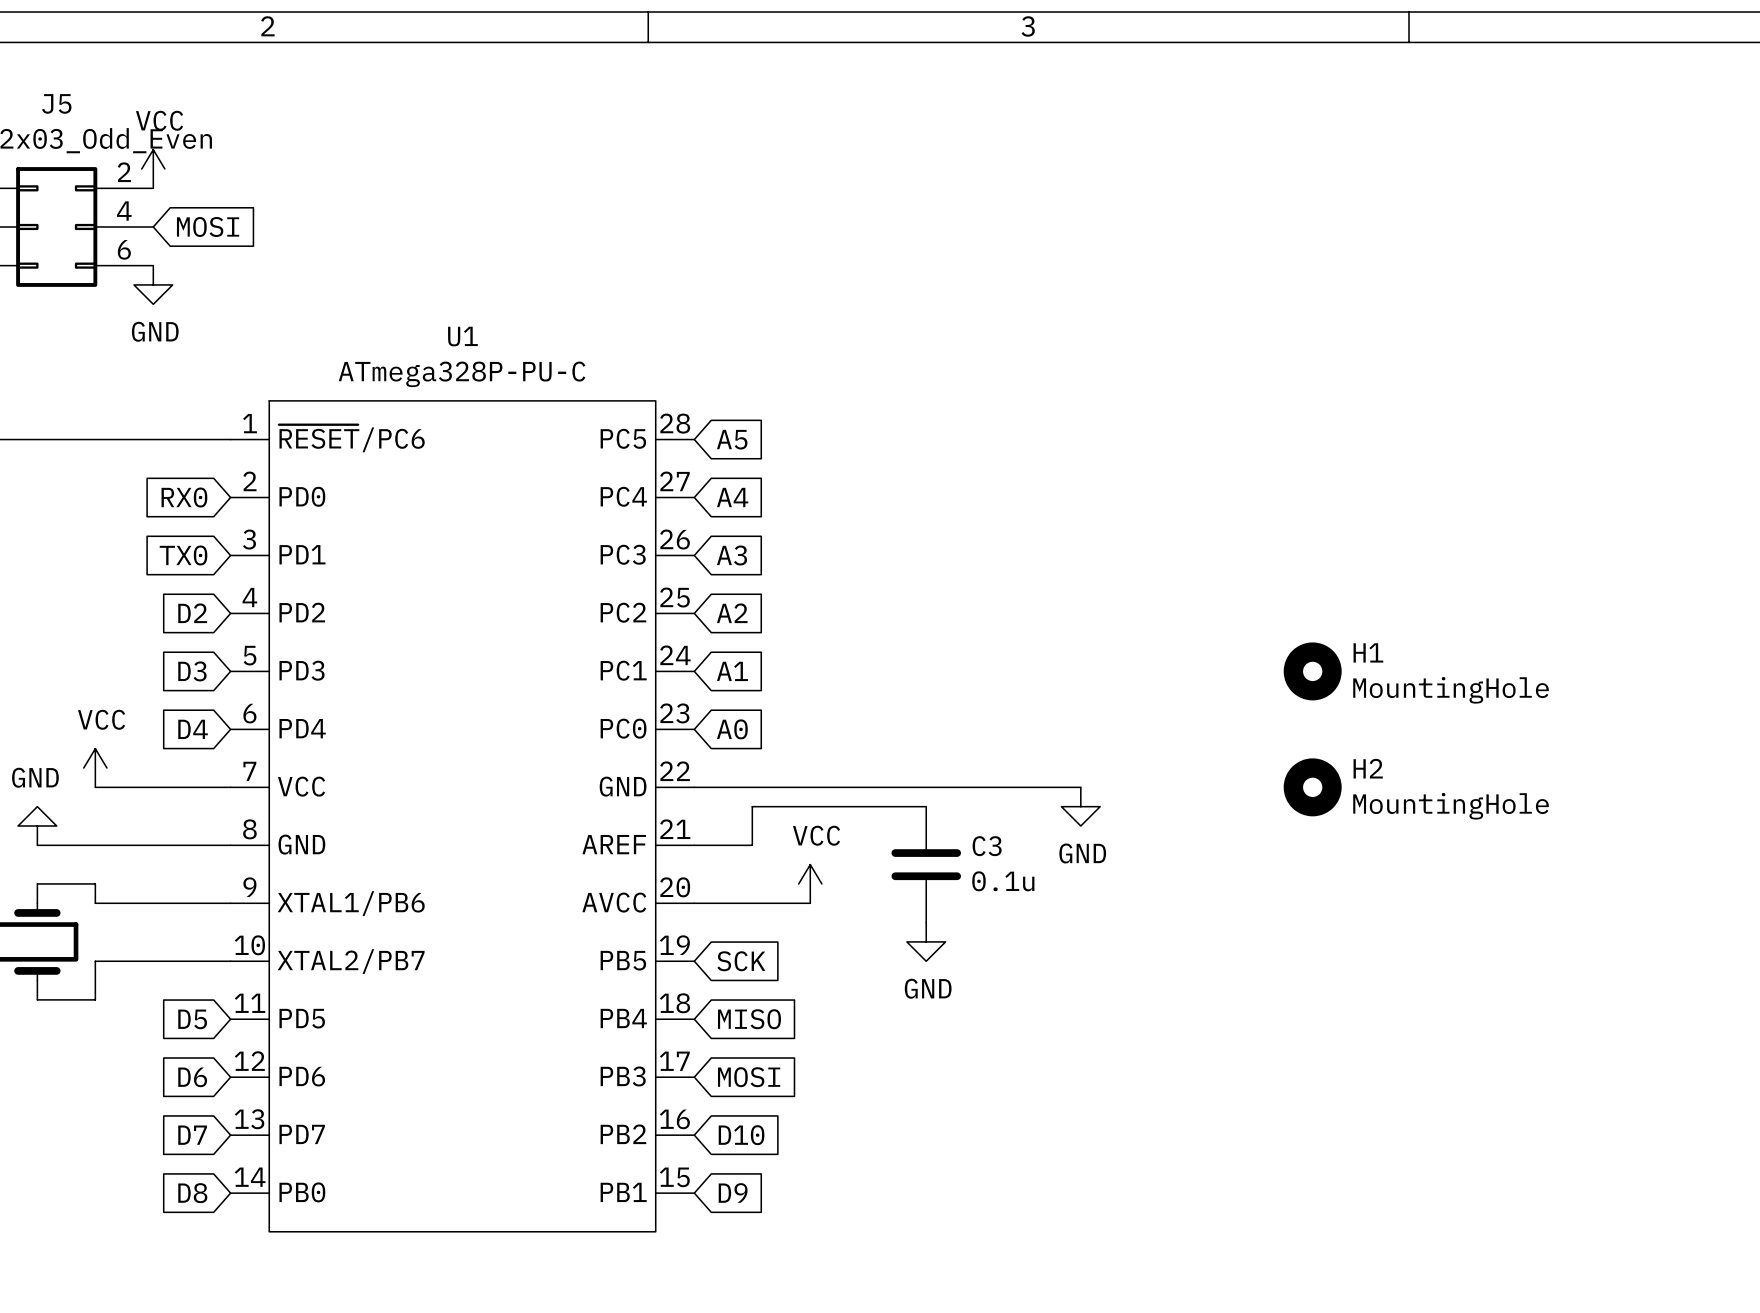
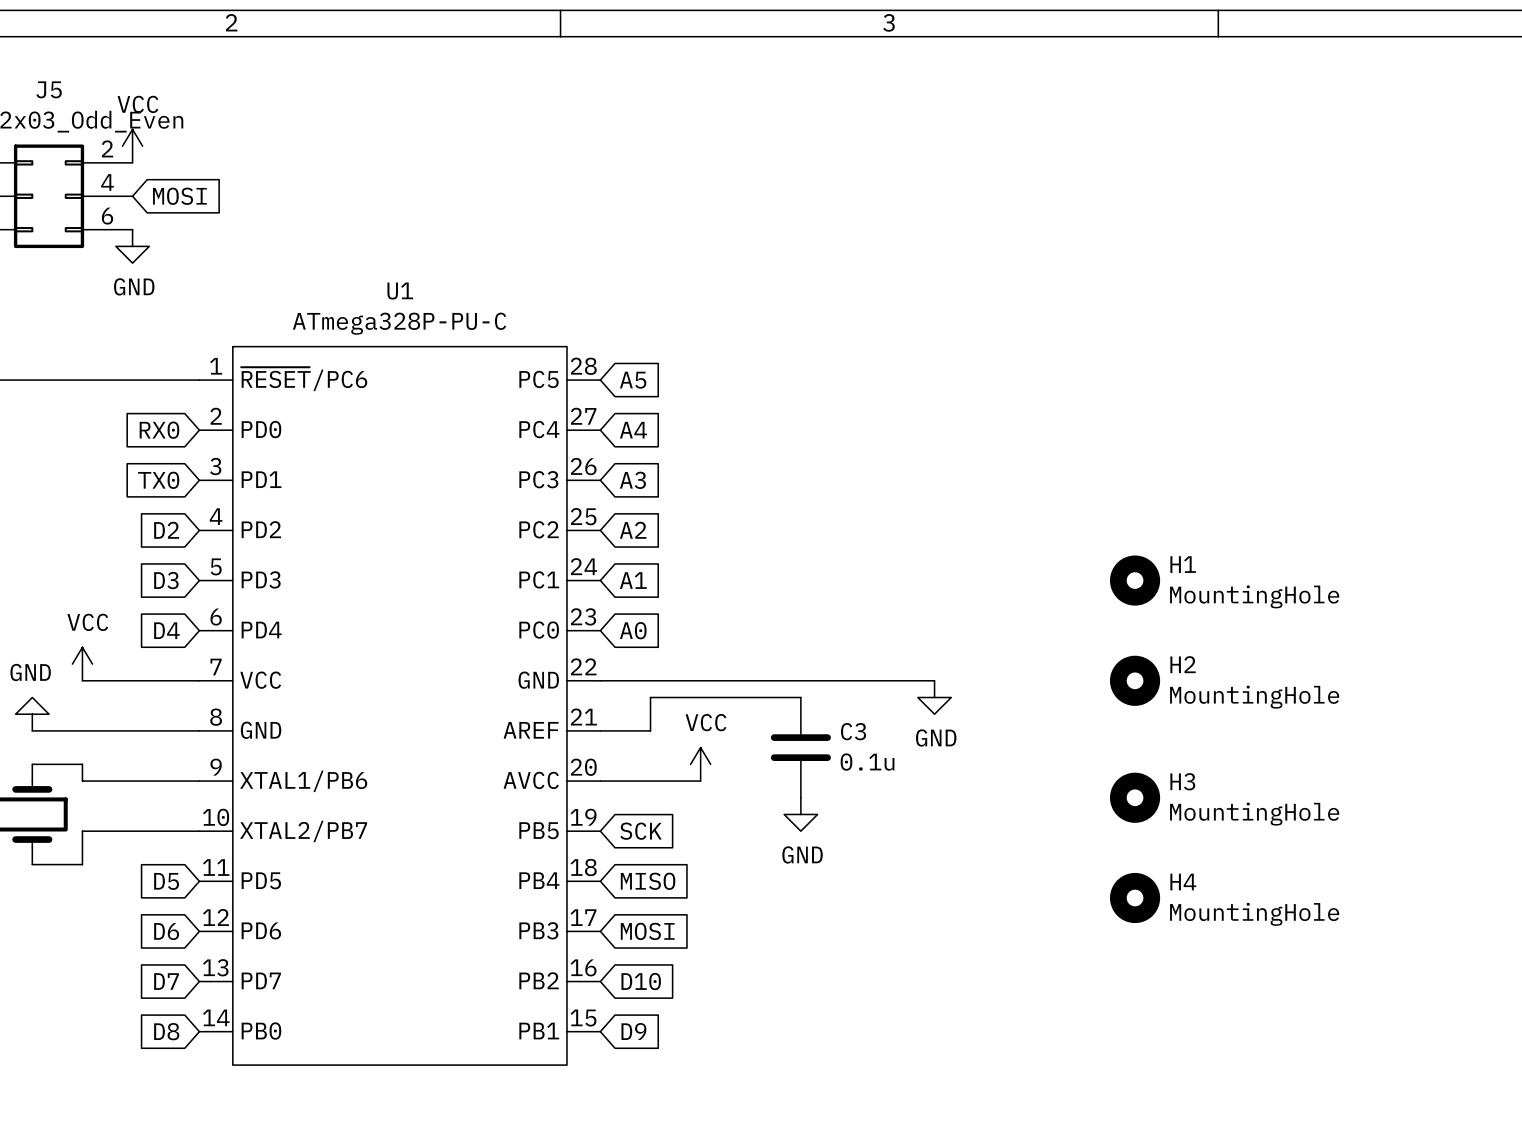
H3: none -> MountingHole (1135, 797)
H4: none -> MountingHole (1135, 898)

